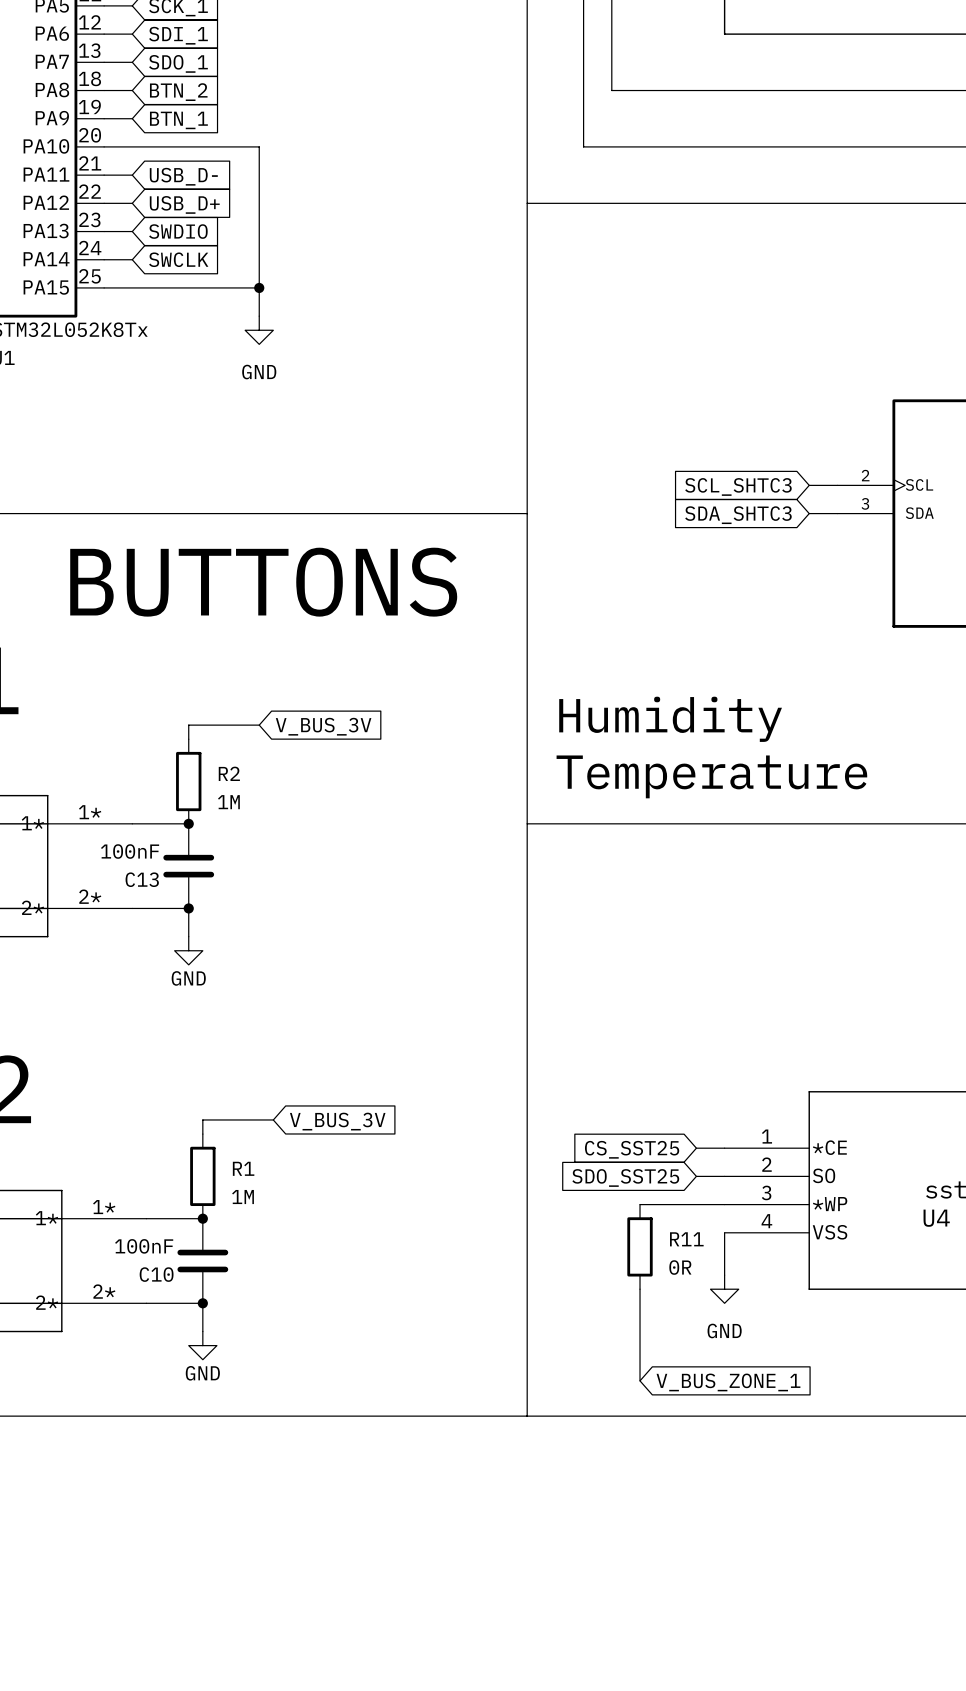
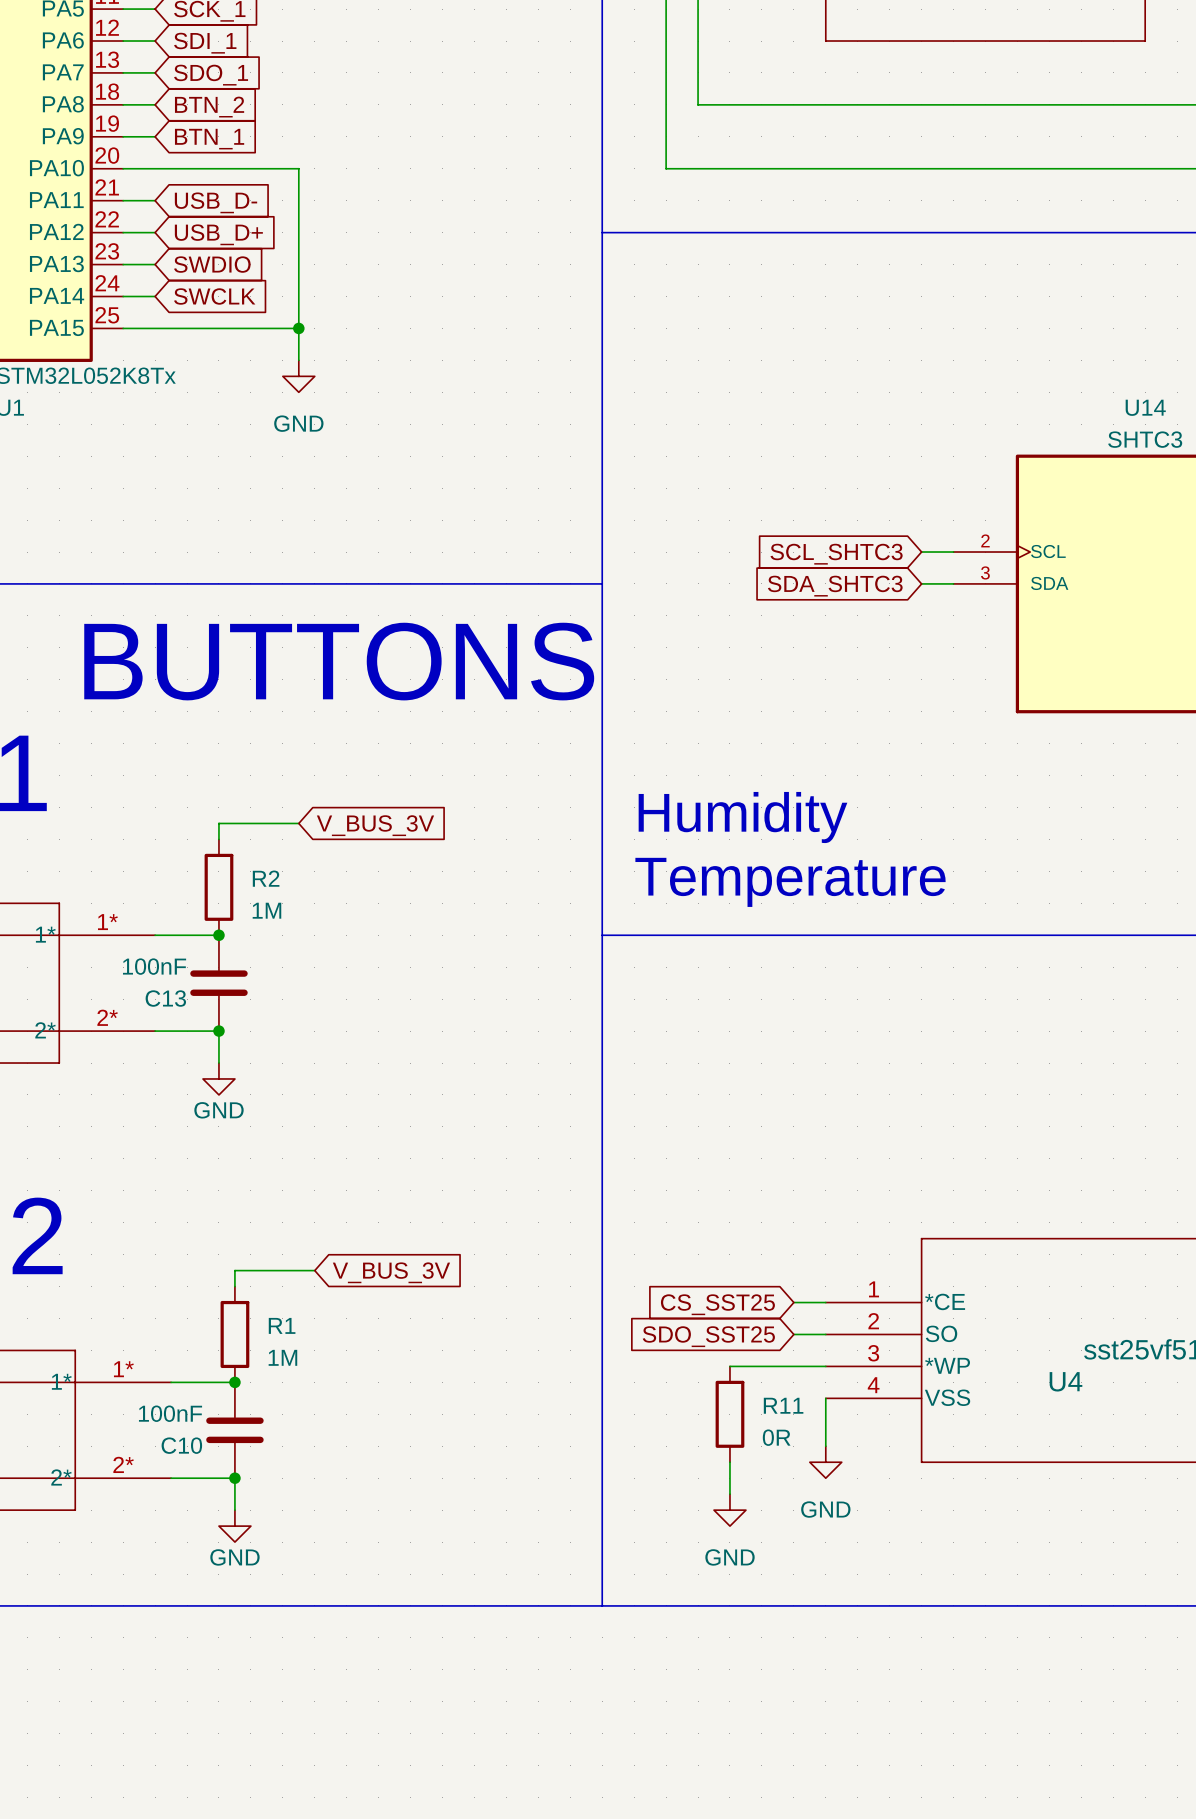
wire: (640, 1317) (640, 1380) -> none
power symbol: none -> GND (729, 1510)
global label: V_BUS_ZONE_1 (728, 1382) -> none

